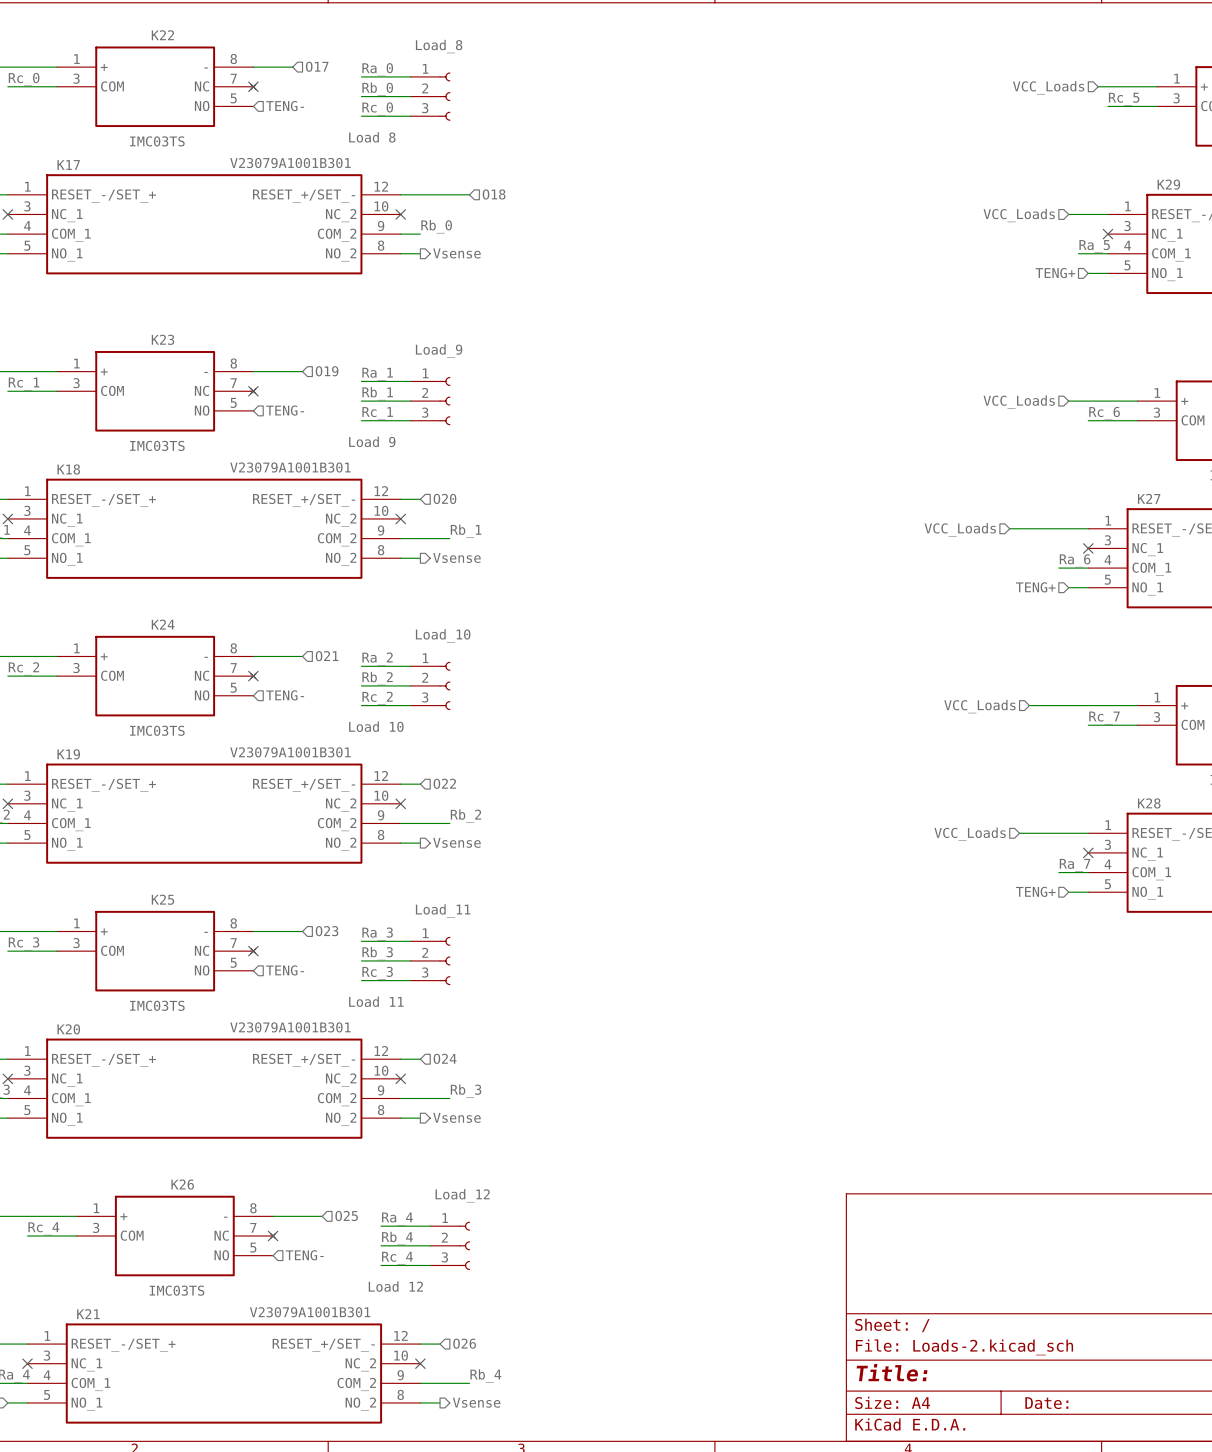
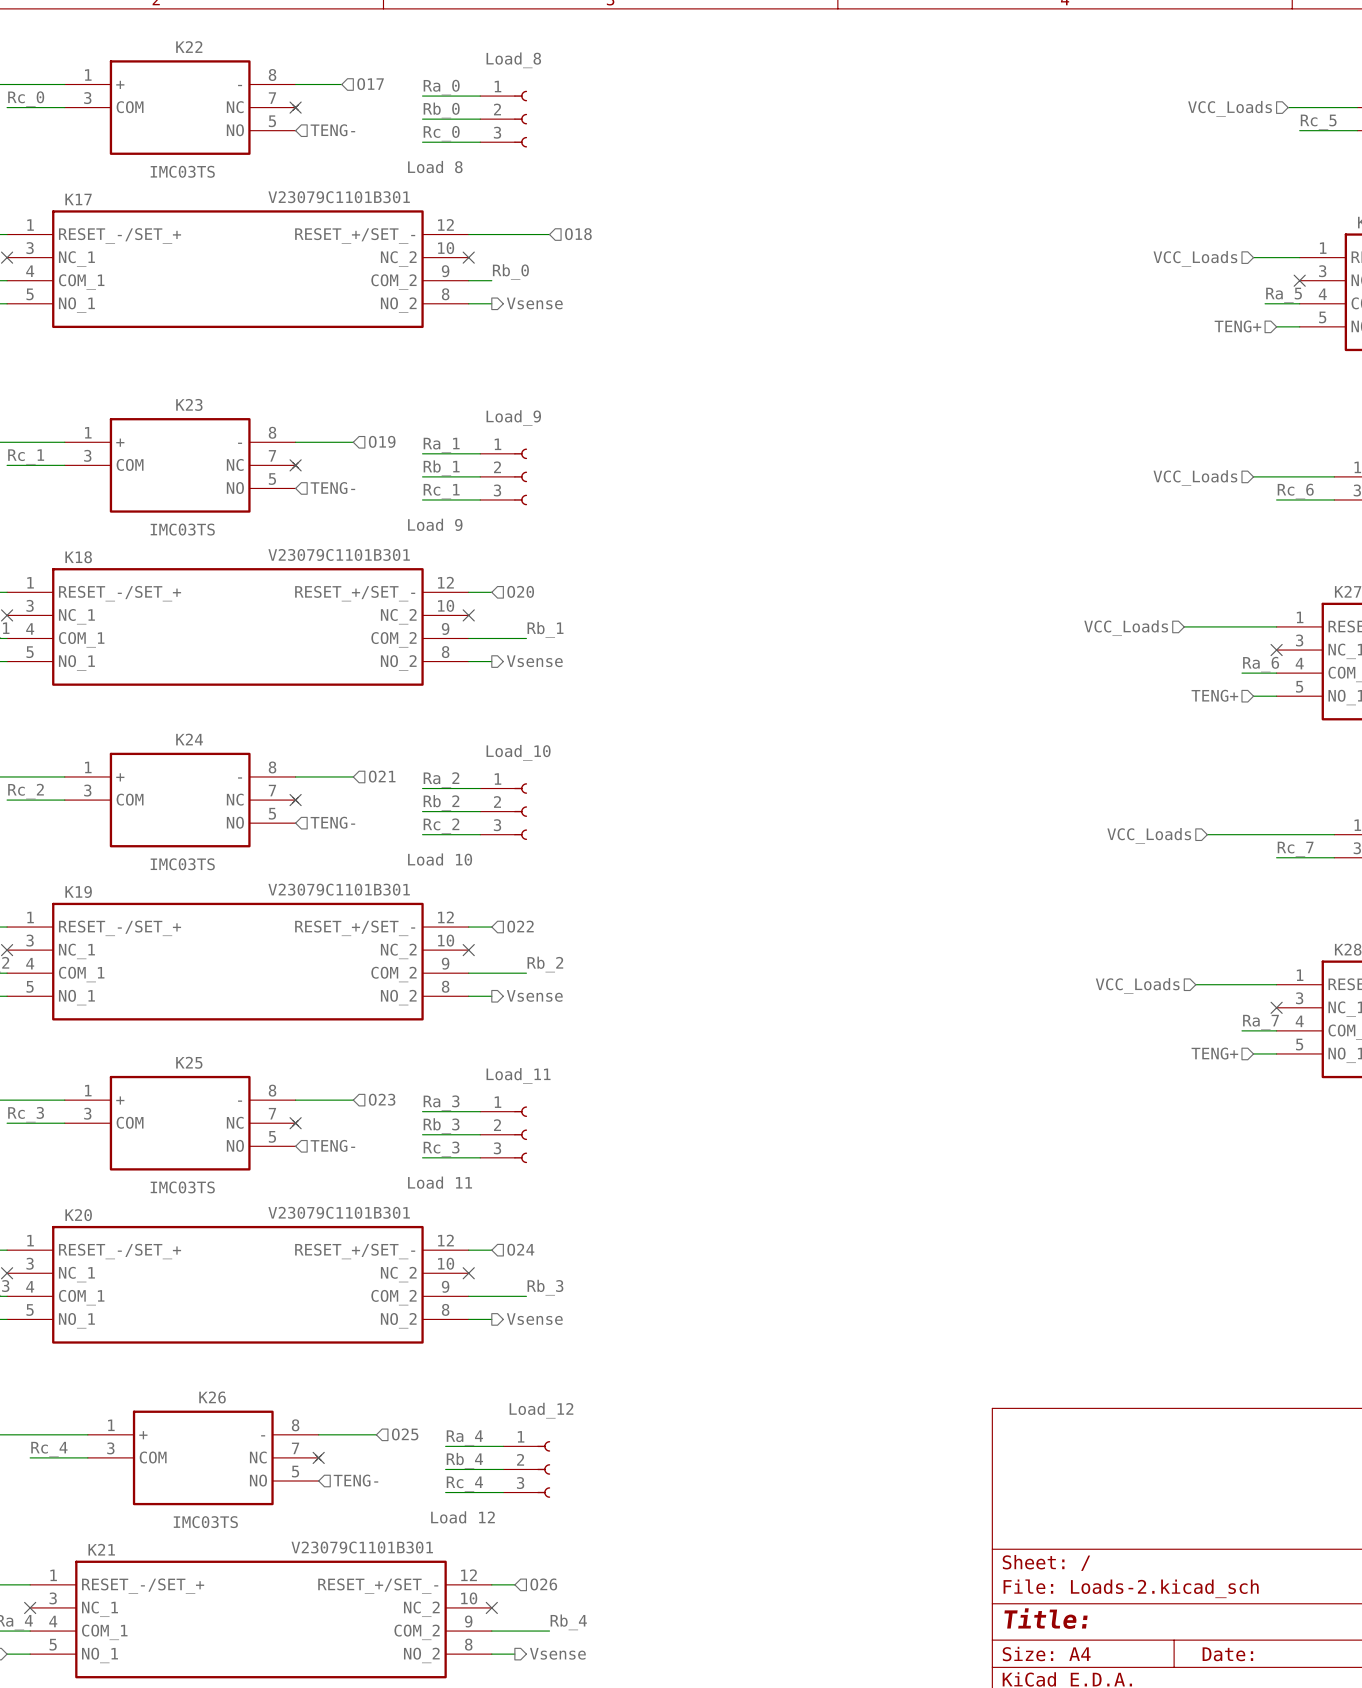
K17 value: V23079A1001B301 (290, 163) -> V23079C1101B301 (339, 197)
K18 value: V23079A1001B301 (290, 467) -> V23079C1101B301 (339, 554)
K19 value: V23079A1001B301 (290, 752) -> V23079C1101B301 (339, 889)
K20 value: V23079A1001B301 (290, 1027) -> V23079C1101B301 (339, 1212)
K21 value: V23079A1001B301 (310, 1312) -> V23079C1101B301 (362, 1547)

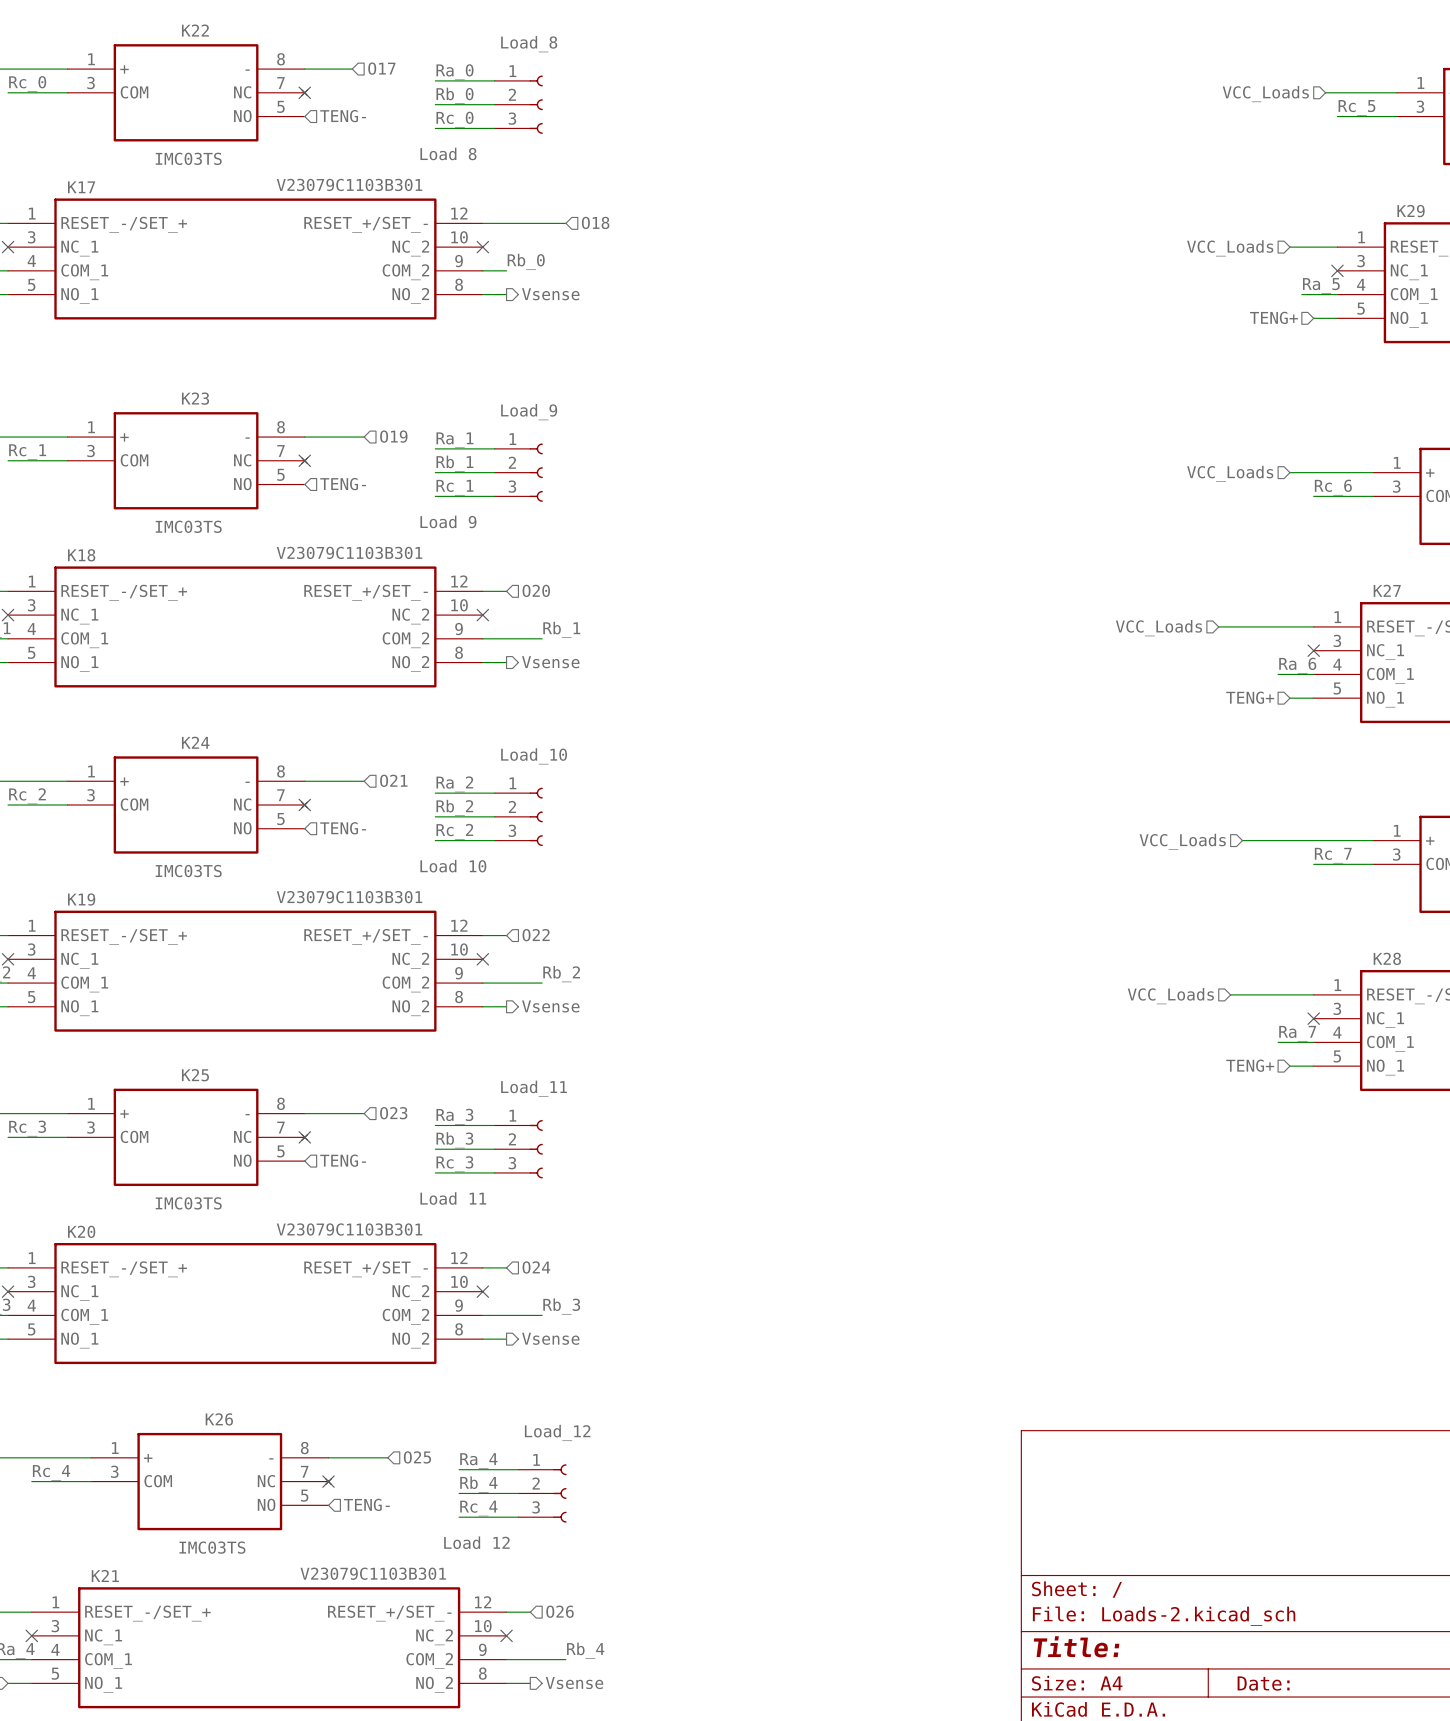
K17 value: V23079C1101B301 (339, 197) -> V23079C1103B301 (349, 184)
K18 value: V23079C1101B301 (339, 554) -> V23079C1103B301 (349, 552)
K19 value: V23079C1101B301 (339, 889) -> V23079C1103B301 (349, 897)
K20 value: V23079C1101B301 (339, 1212) -> V23079C1103B301 (349, 1229)
K21 value: V23079C1101B301 (362, 1547) -> V23079C1103B301 (373, 1573)

